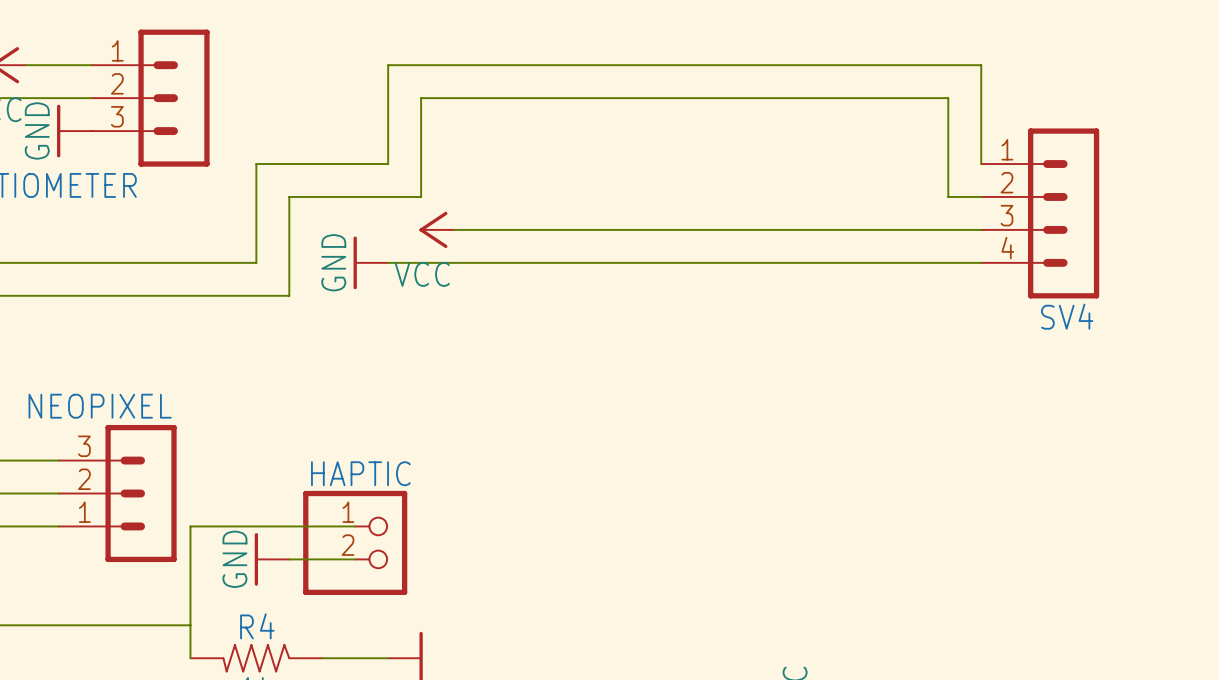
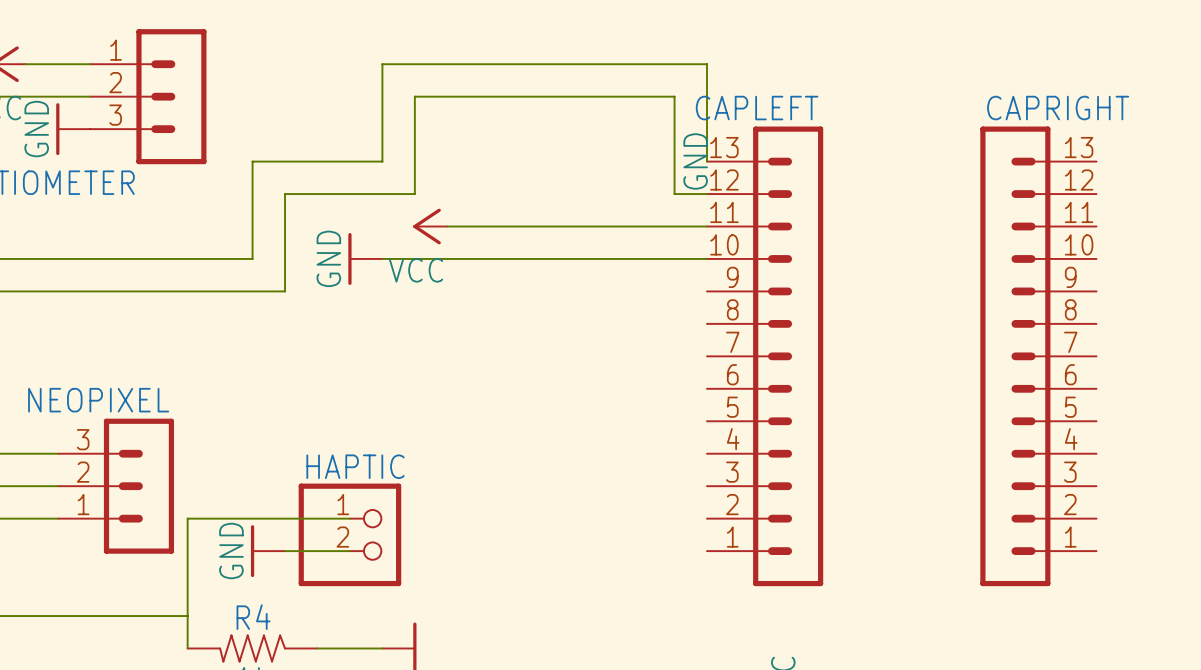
wire: (717, 65) (981, 65) (981, 164) -> (707, 64) (707, 161)
wire: (684, 98) (948, 98) (948, 196) (981, 196) -> (674, 96) (674, 194) (707, 194)
power symbol text: none -> GND (695, 161)
SV4: (1040, 213) -> none
wire: (717, 229) (981, 229) -> none
wire: (717, 262) (981, 262) -> none
CAPLEFT: none -> (765, 356)
CAPRIGHT: none -> (1038, 356)

